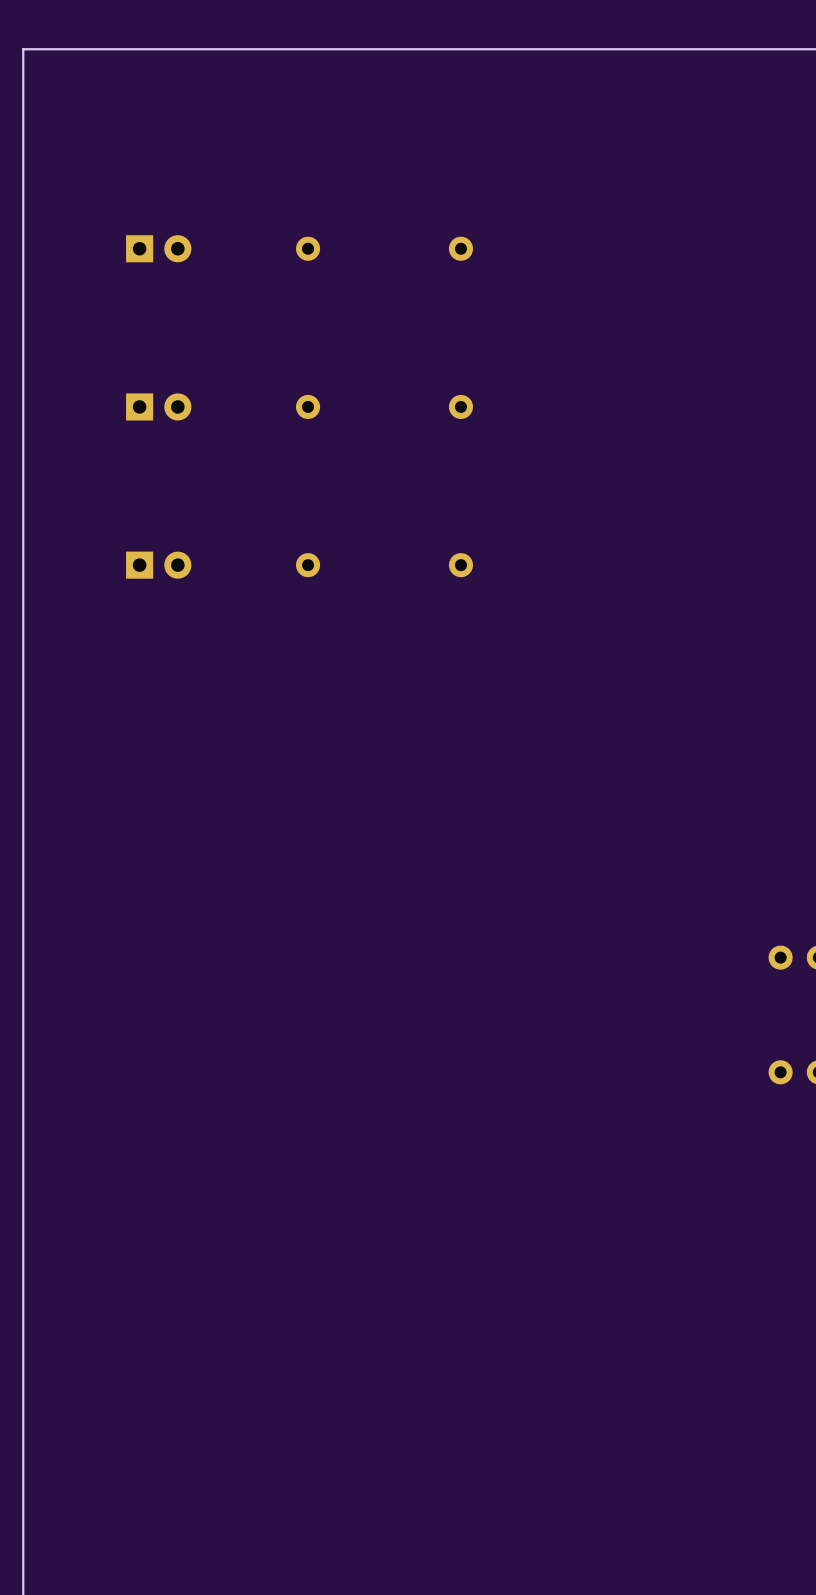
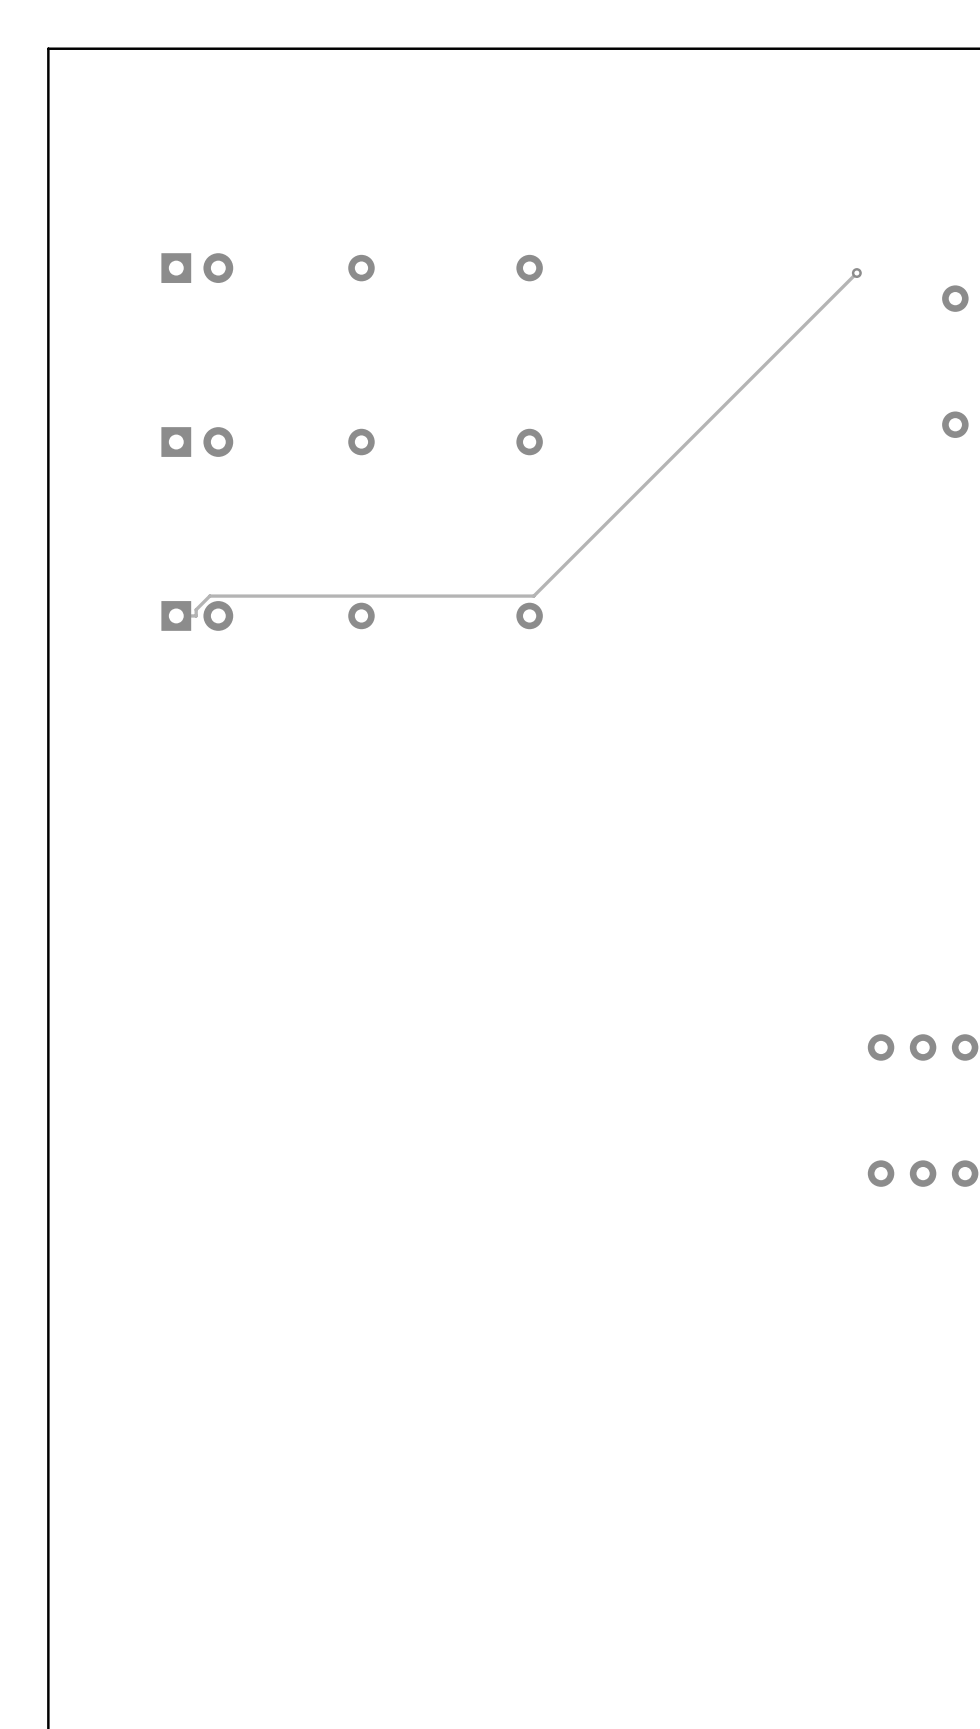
track: none -> (856, 273) (533, 596) (209, 596) (196, 609) (196, 615) (176, 615)
via: none -> (856, 273)

